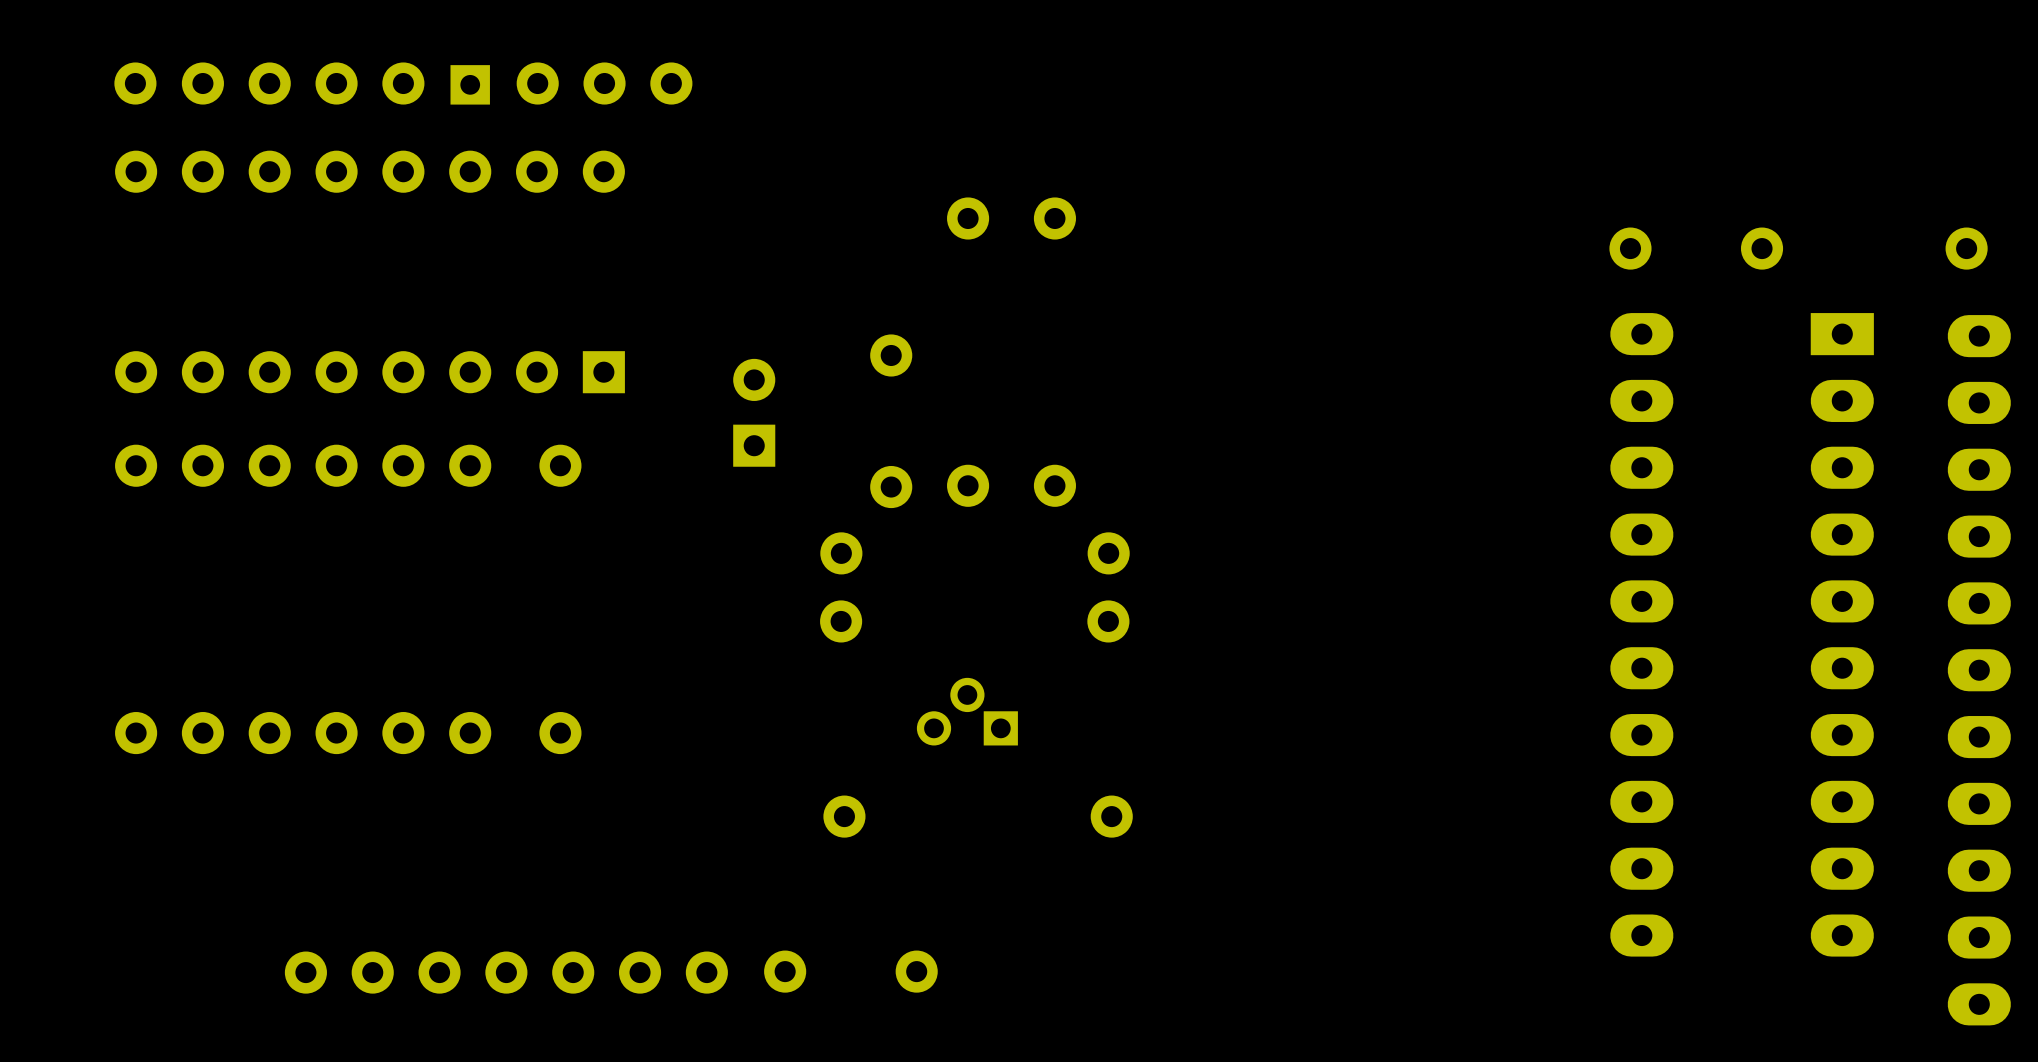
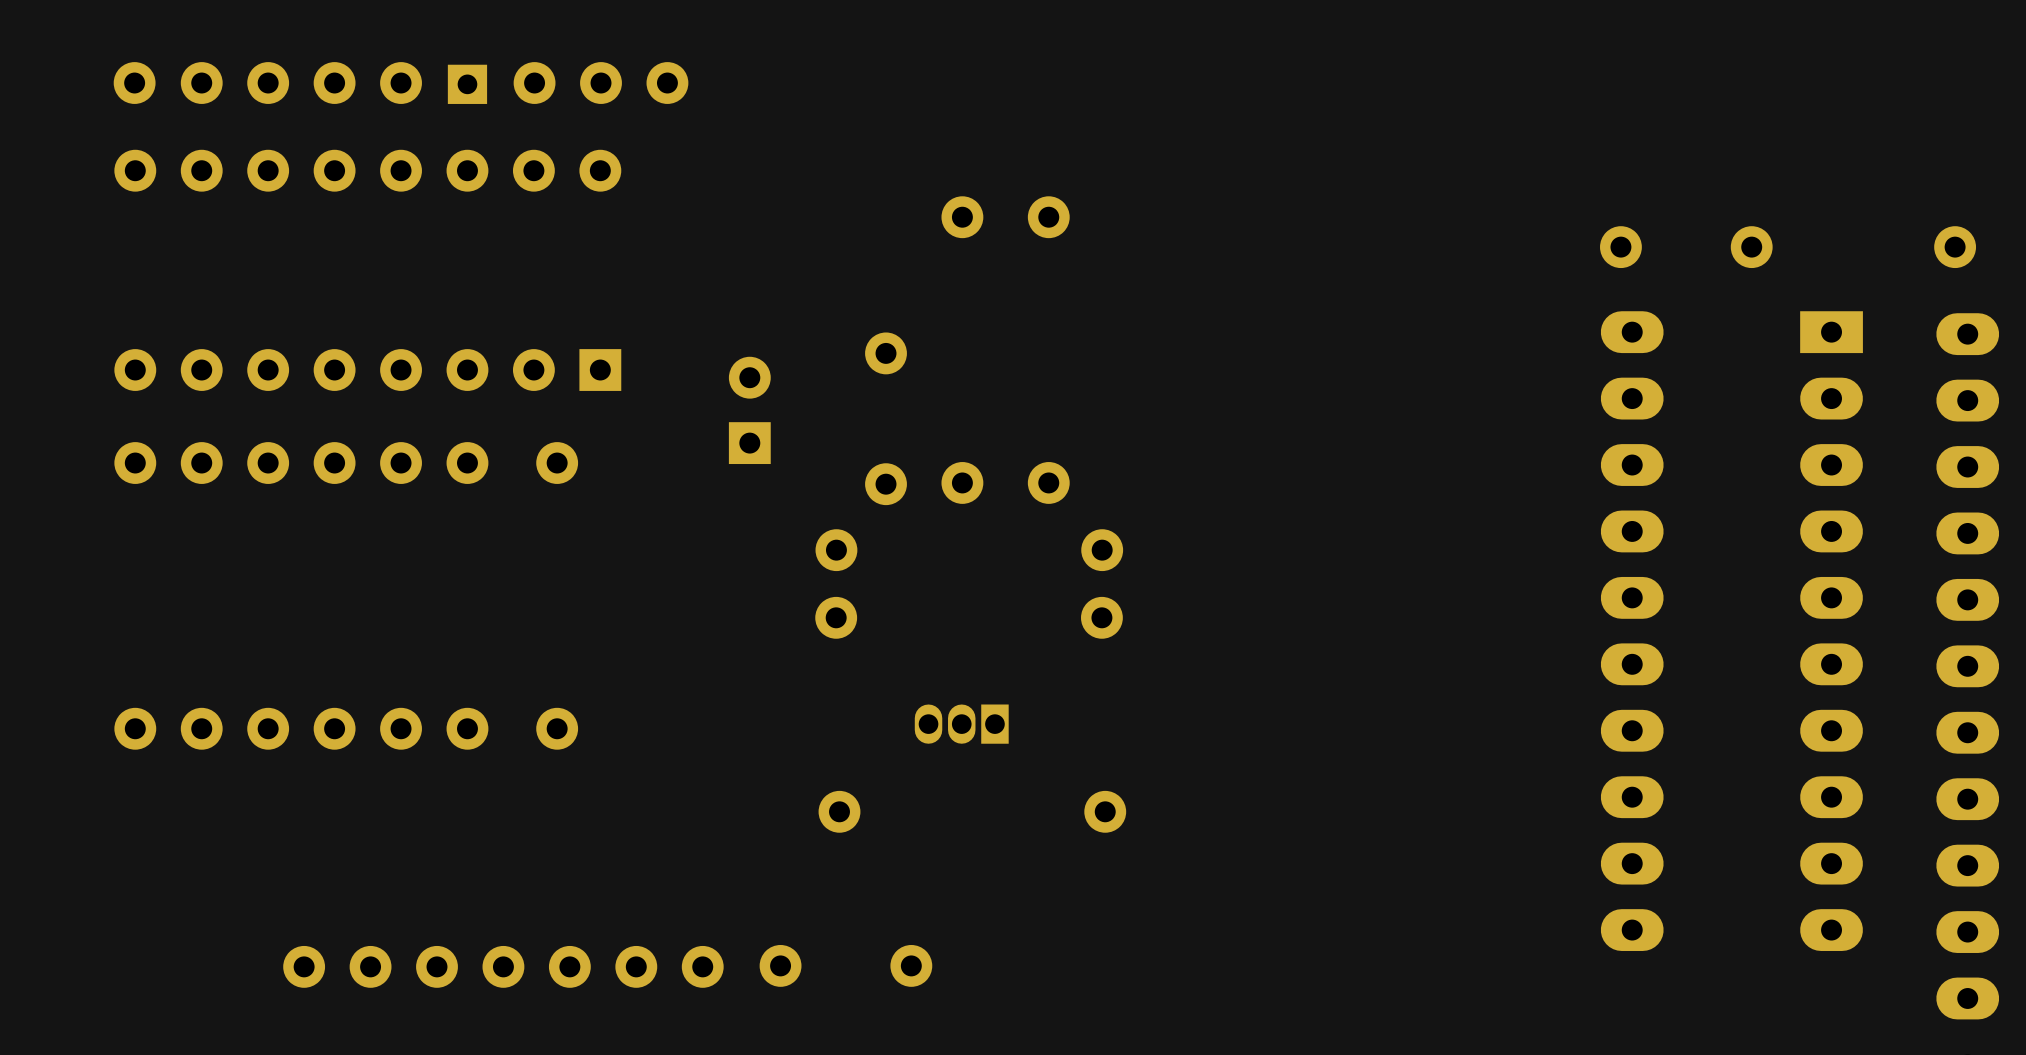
part footprint: [916, 677, 1018, 746] -> [914, 704, 1009, 744]

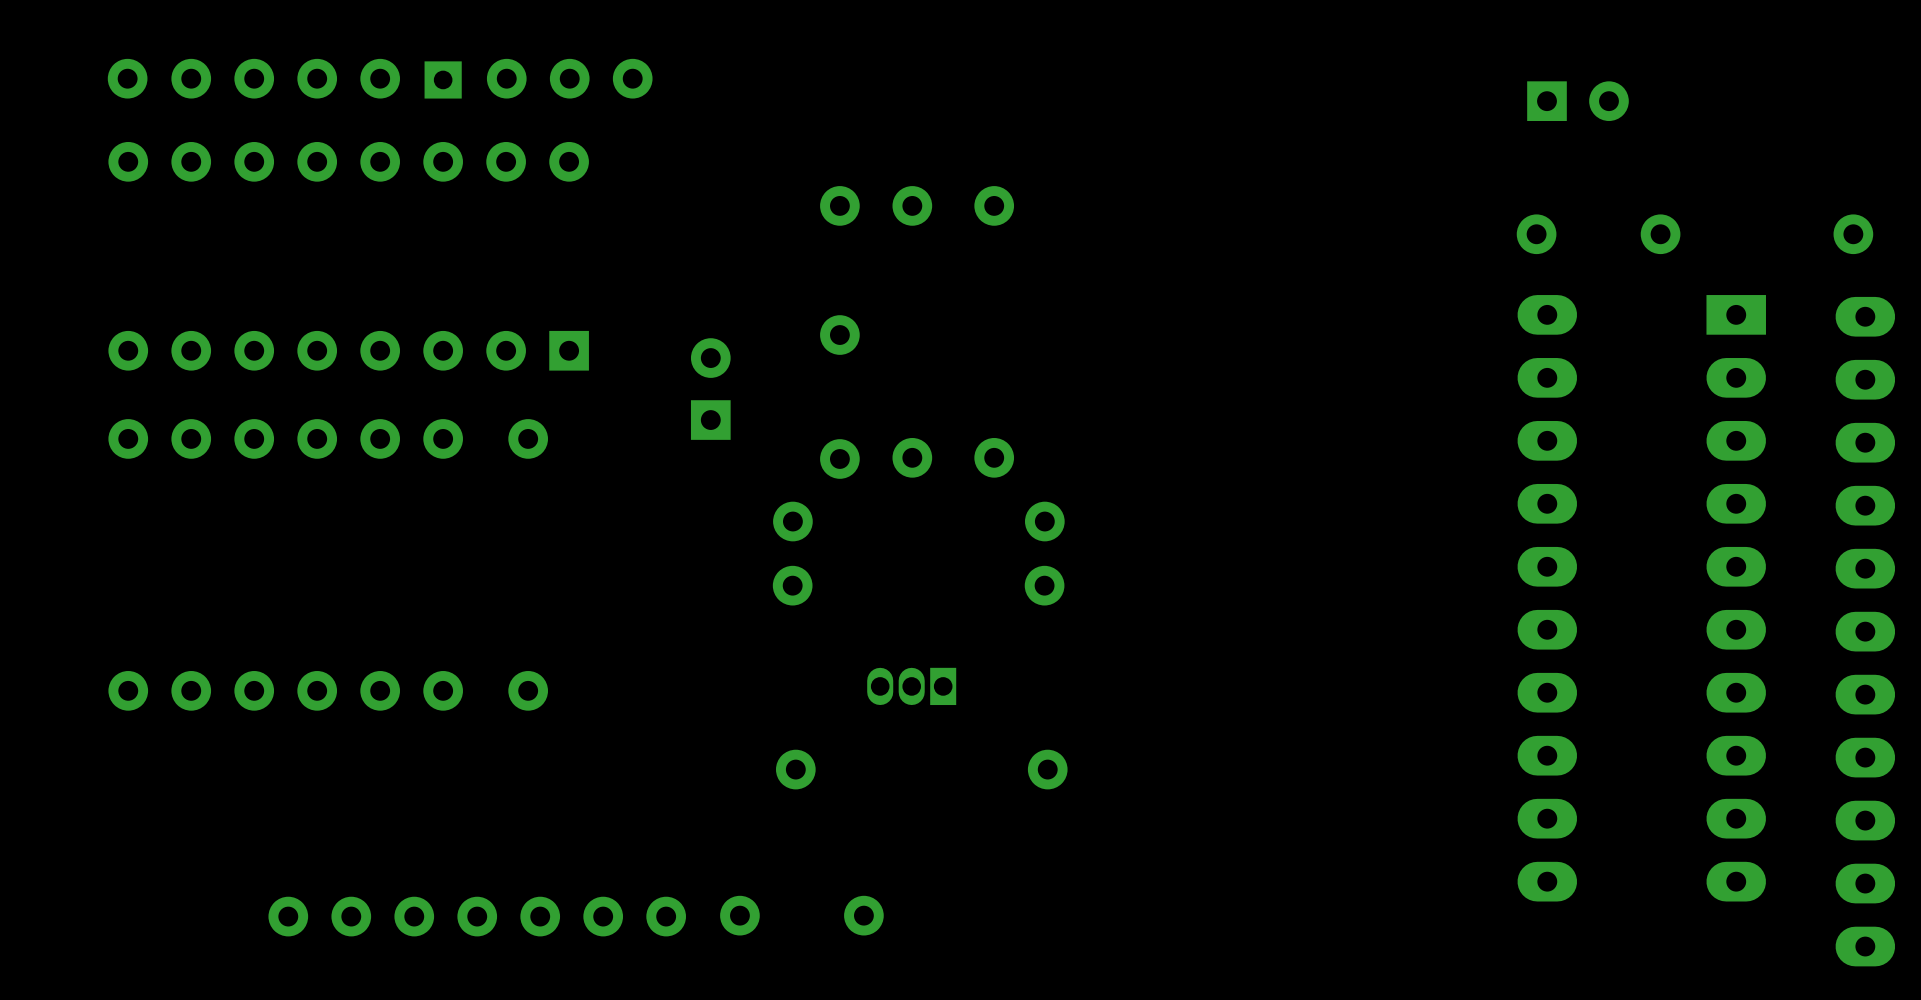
part: none -> (1577, 101)
part: none -> (839, 205)

